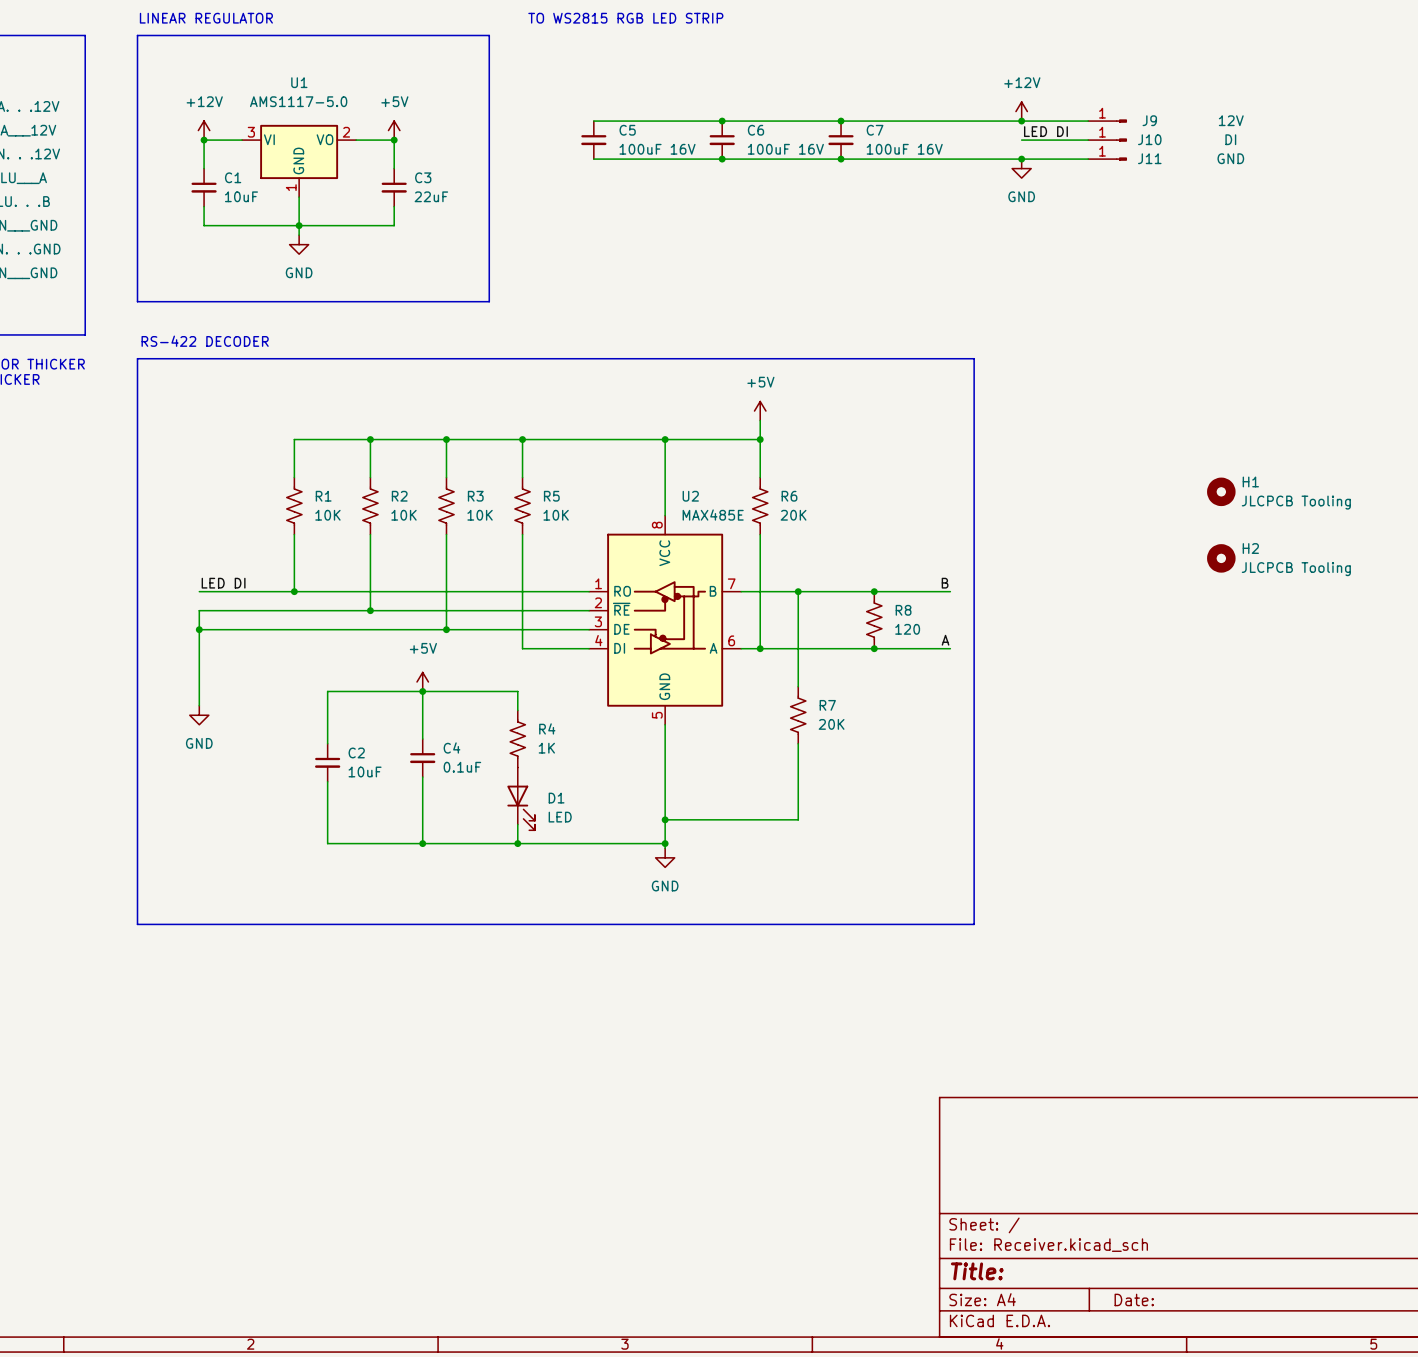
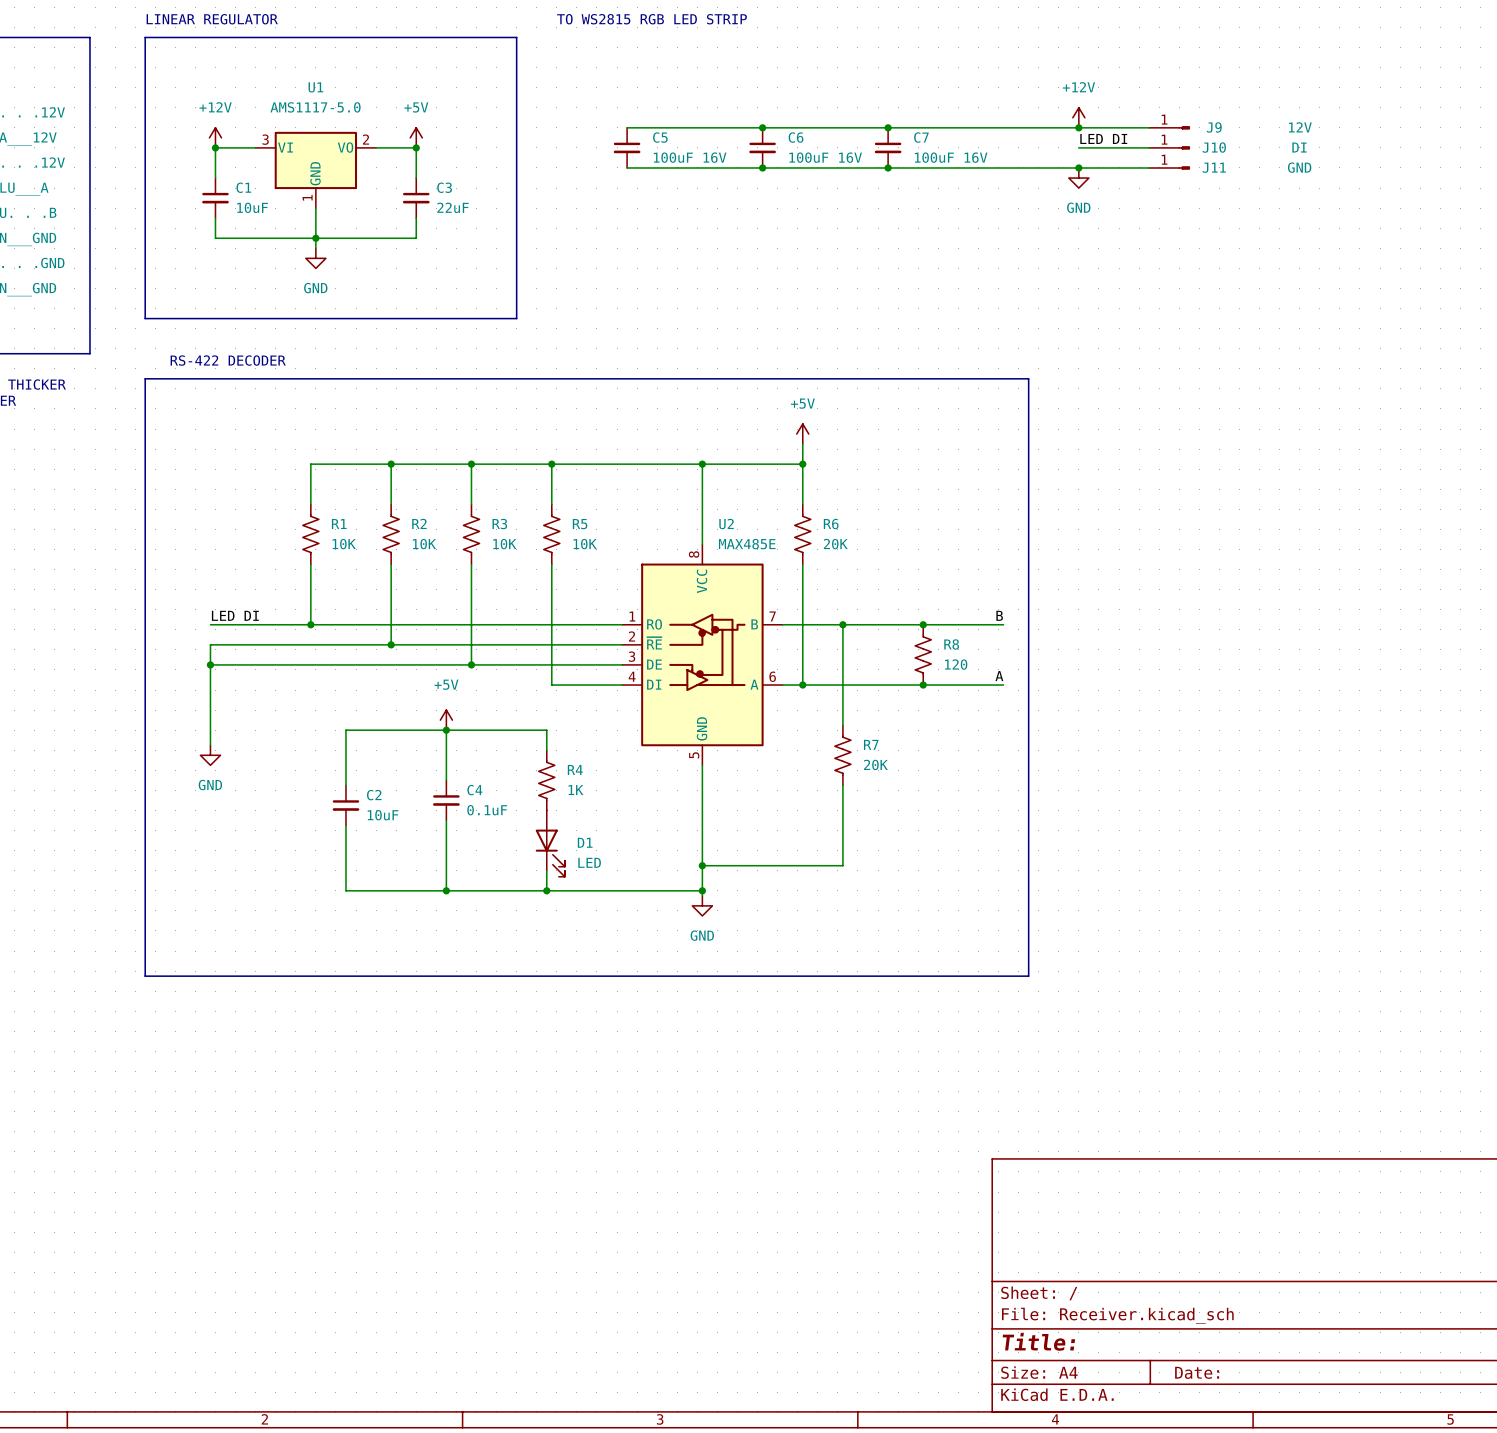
H1: JLCPCB Tooling (1221, 491) -> none
H2: JLCPCB Tooling (1221, 558) -> none

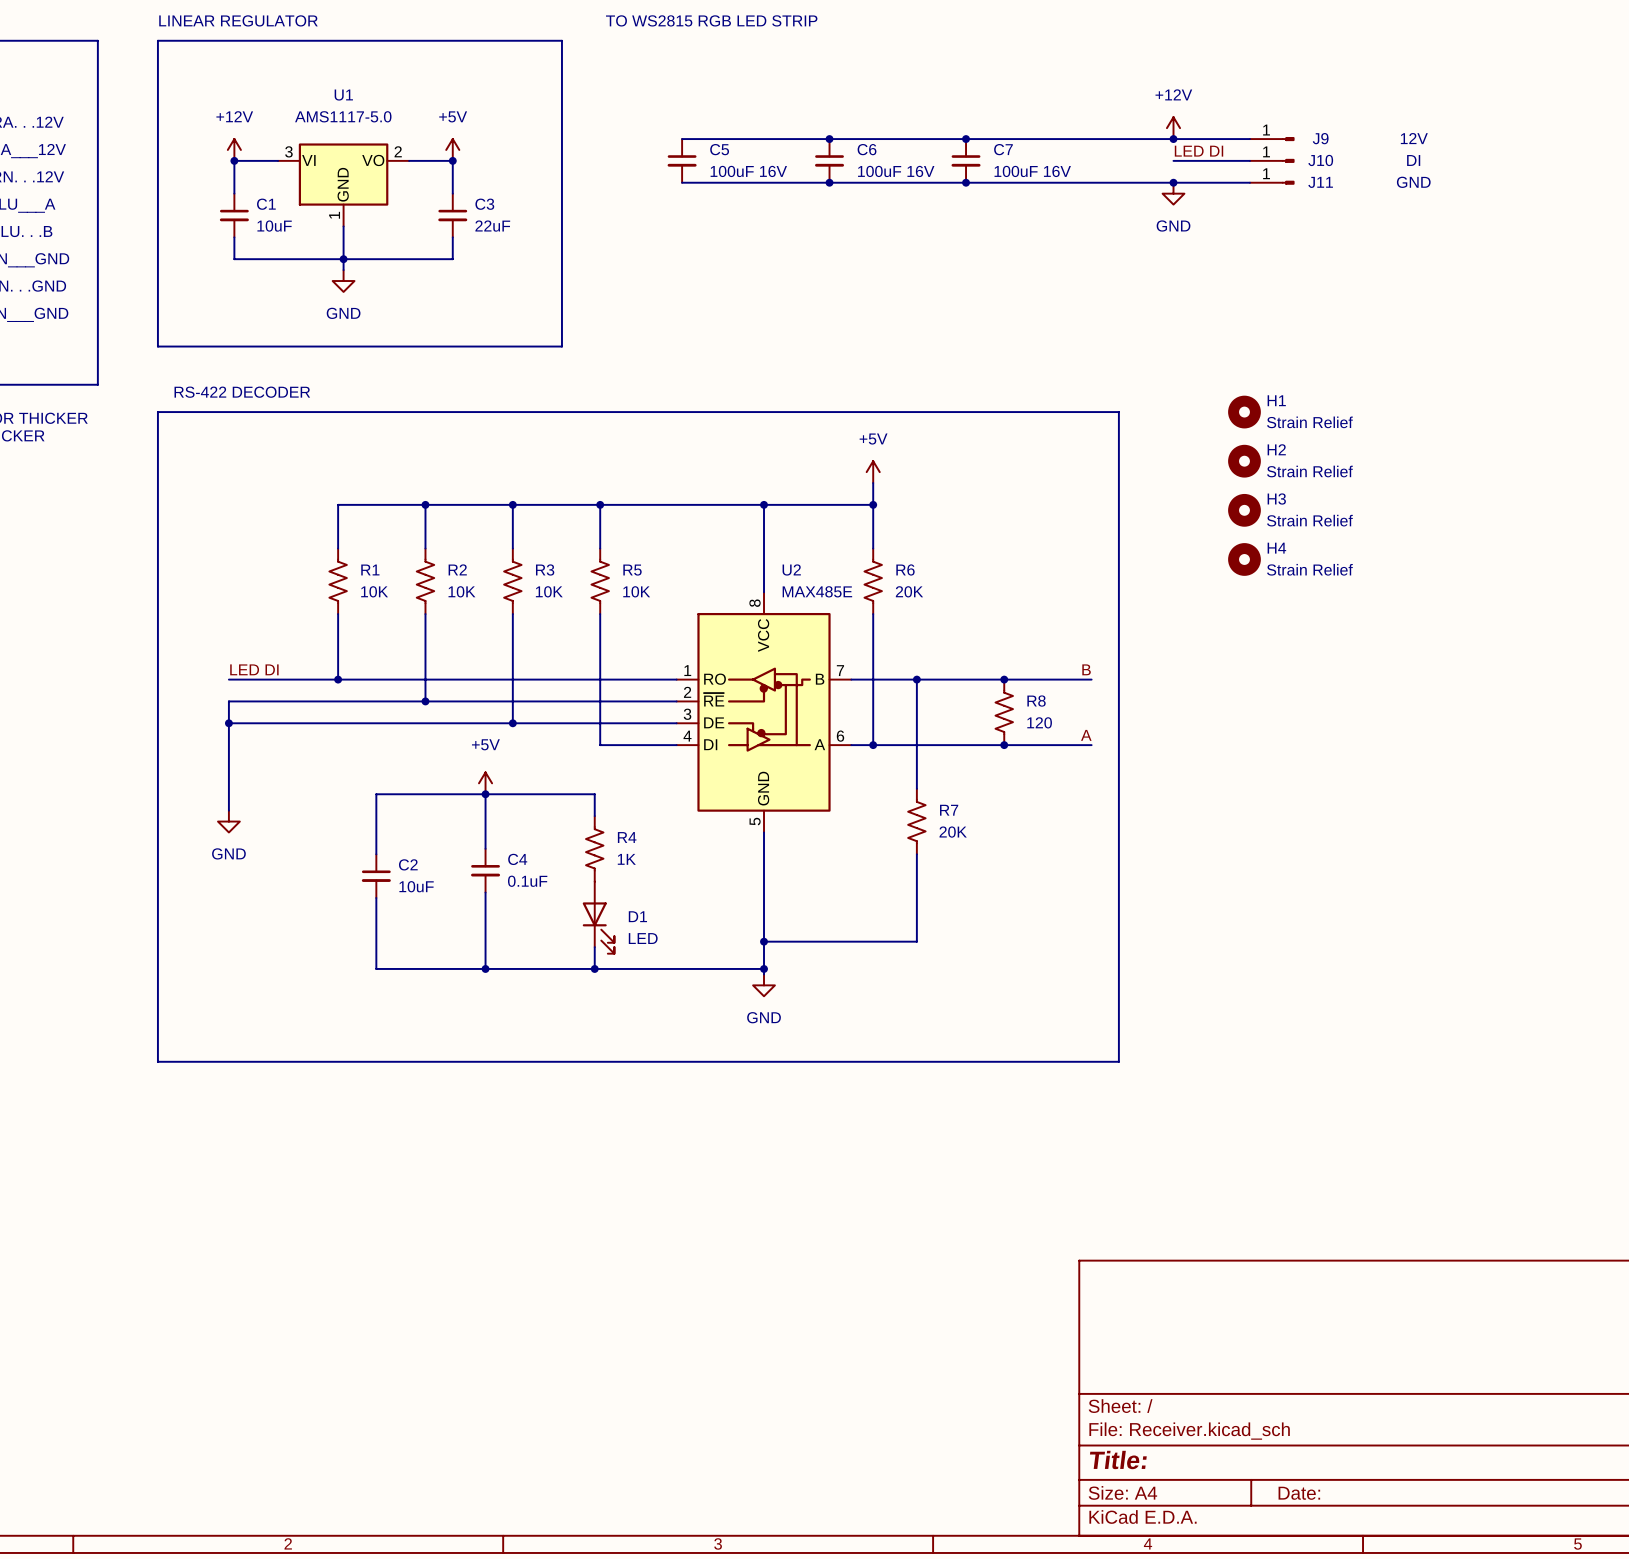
H1: none -> Strain Relief (1244, 412)
H2: none -> Strain Relief (1244, 461)
H3: none -> Strain Relief (1244, 510)
H4: none -> Strain Relief (1244, 559)

